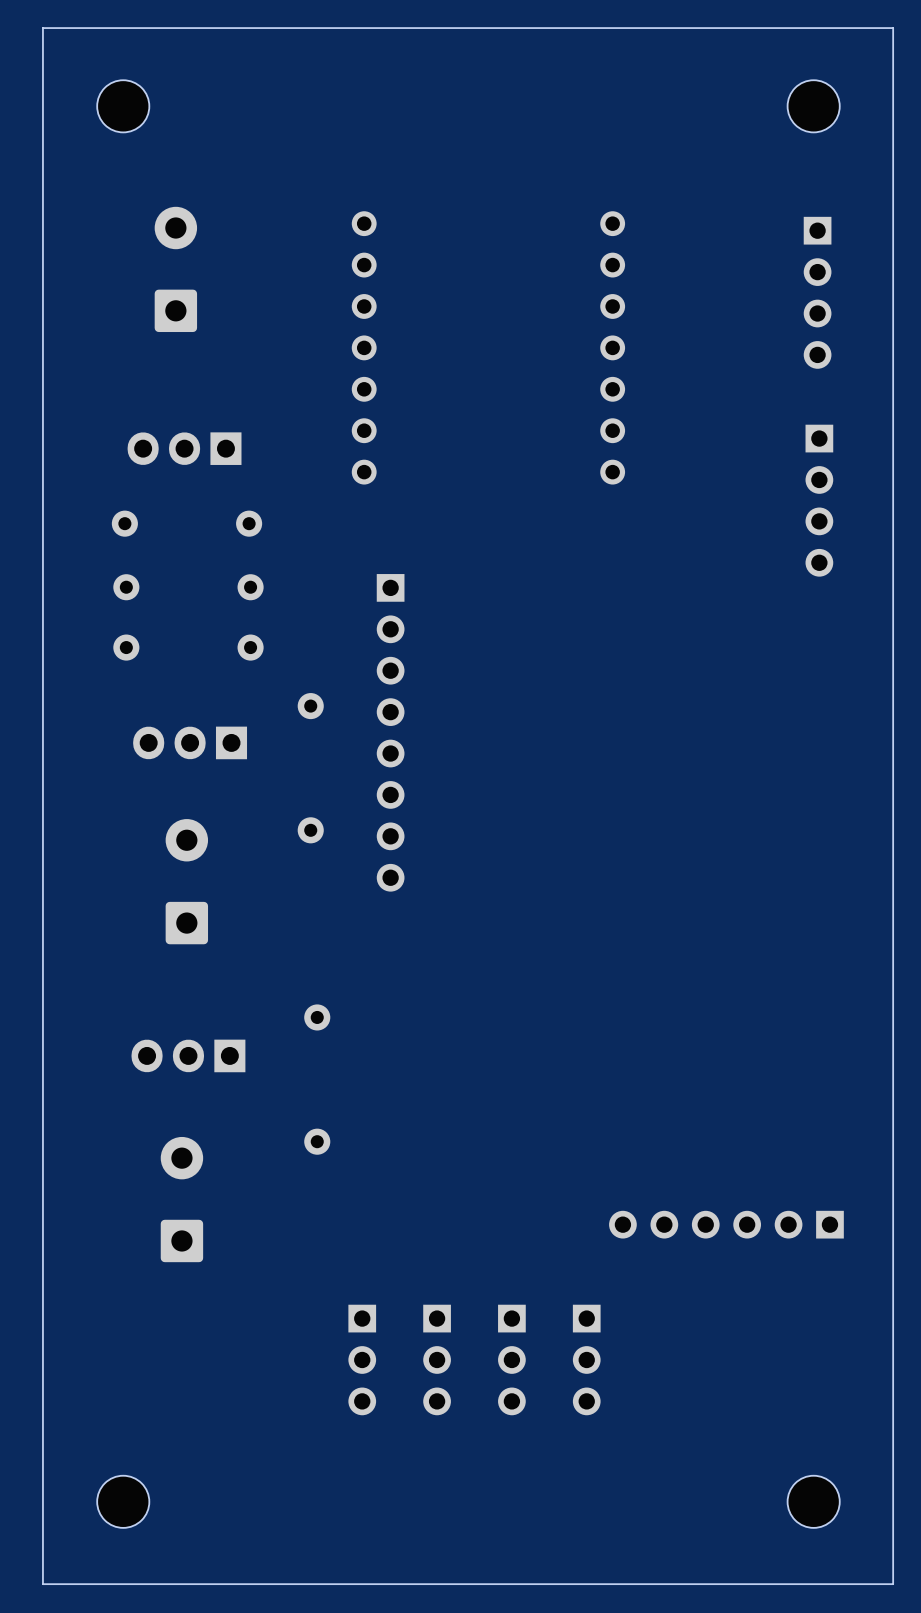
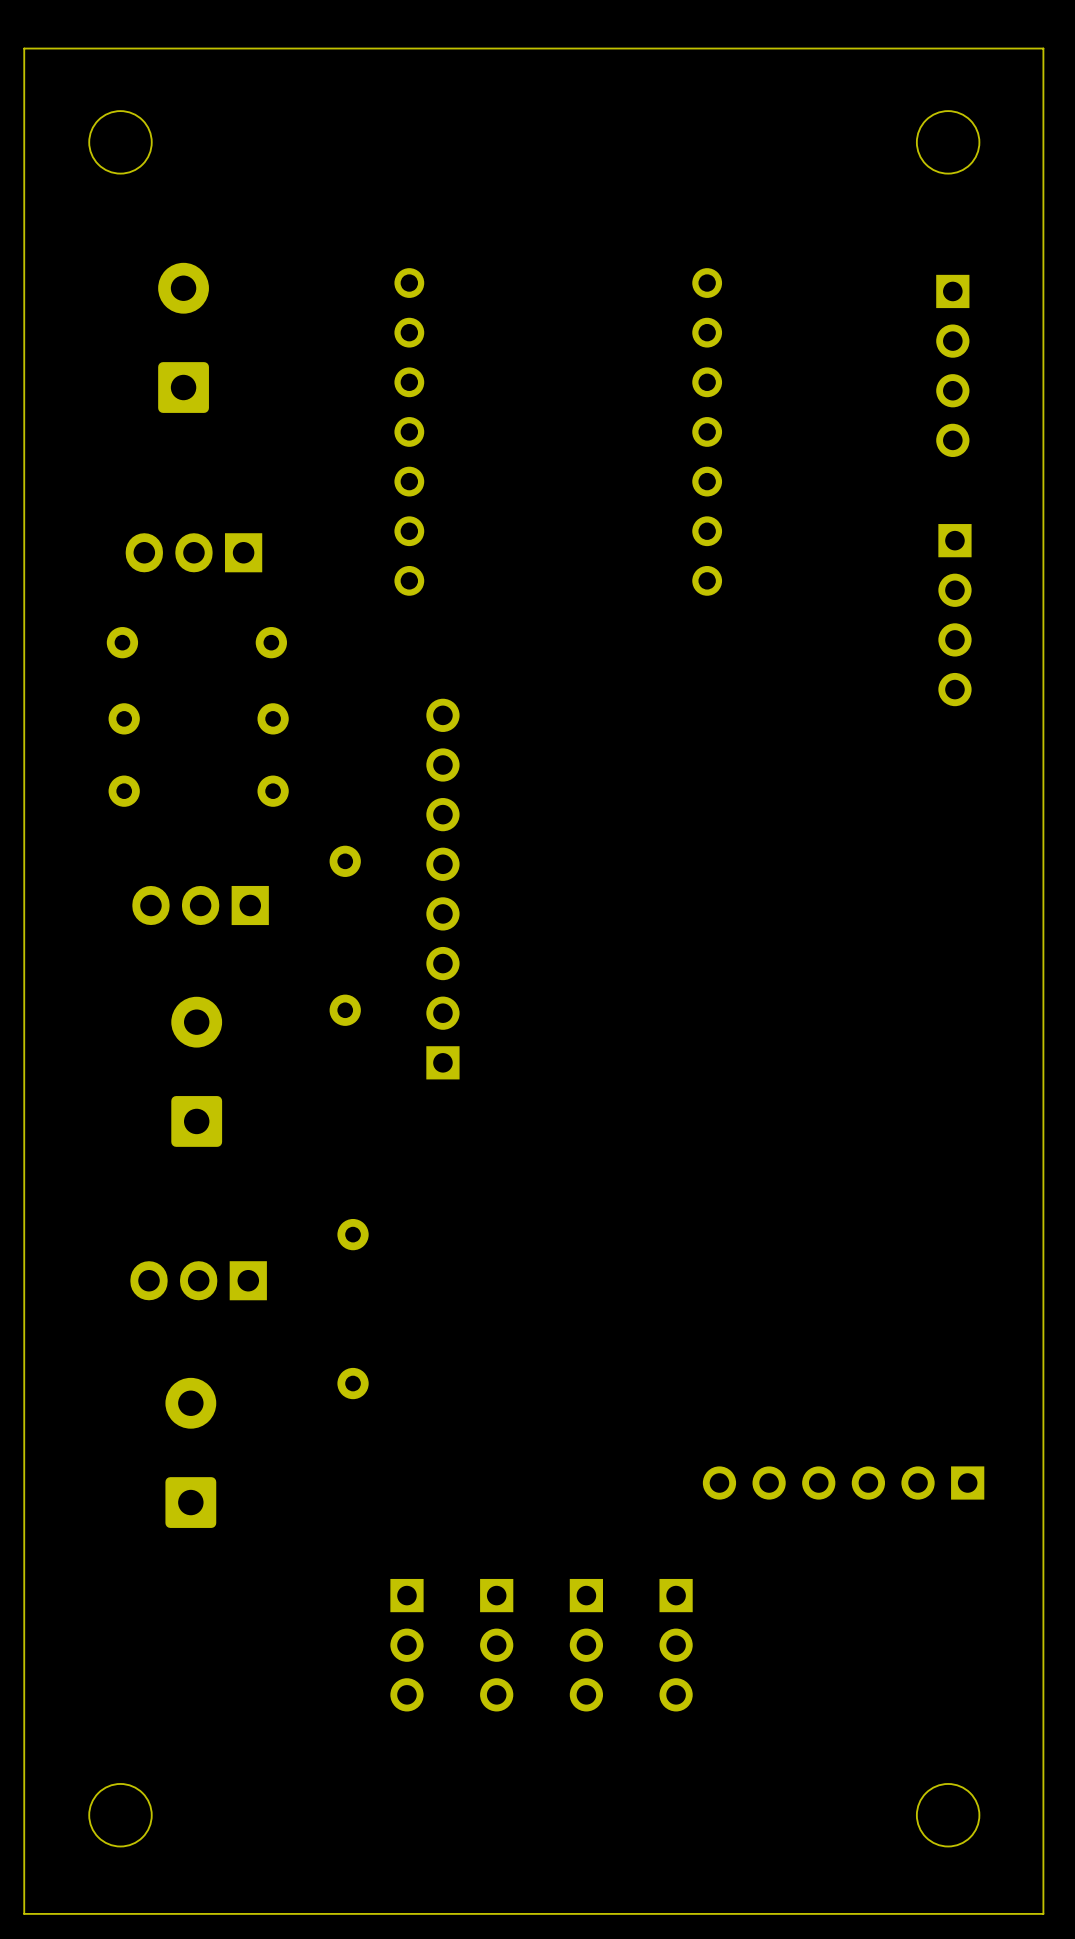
part rotation: 0° (390, 732) -> 180° (442, 889)

